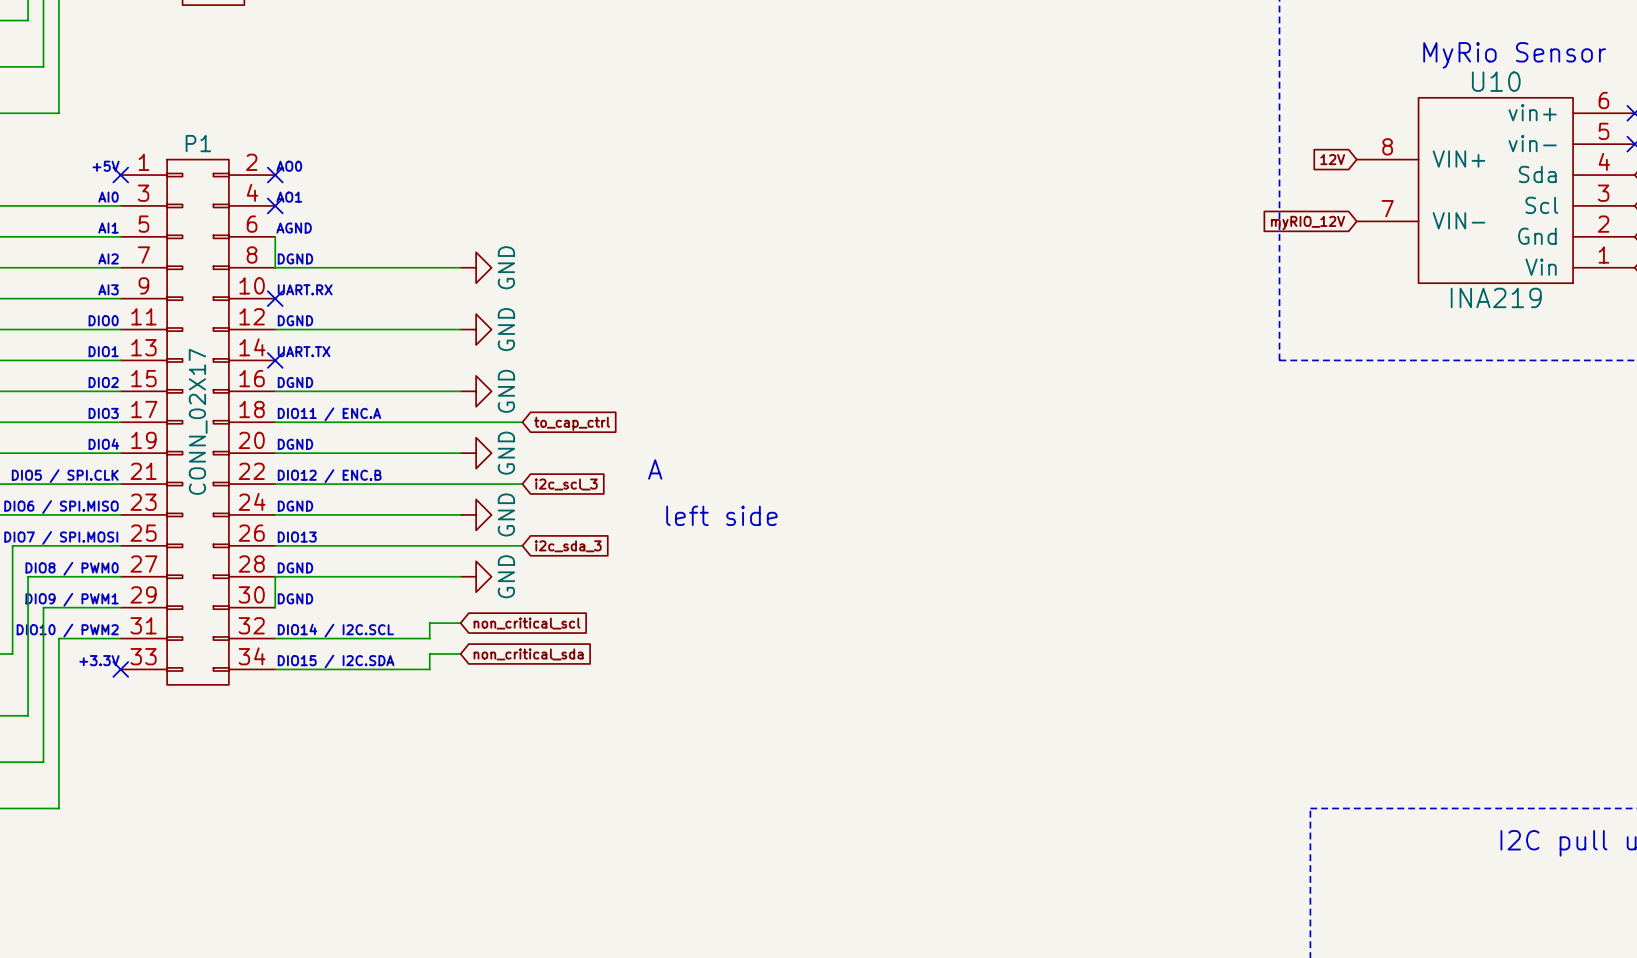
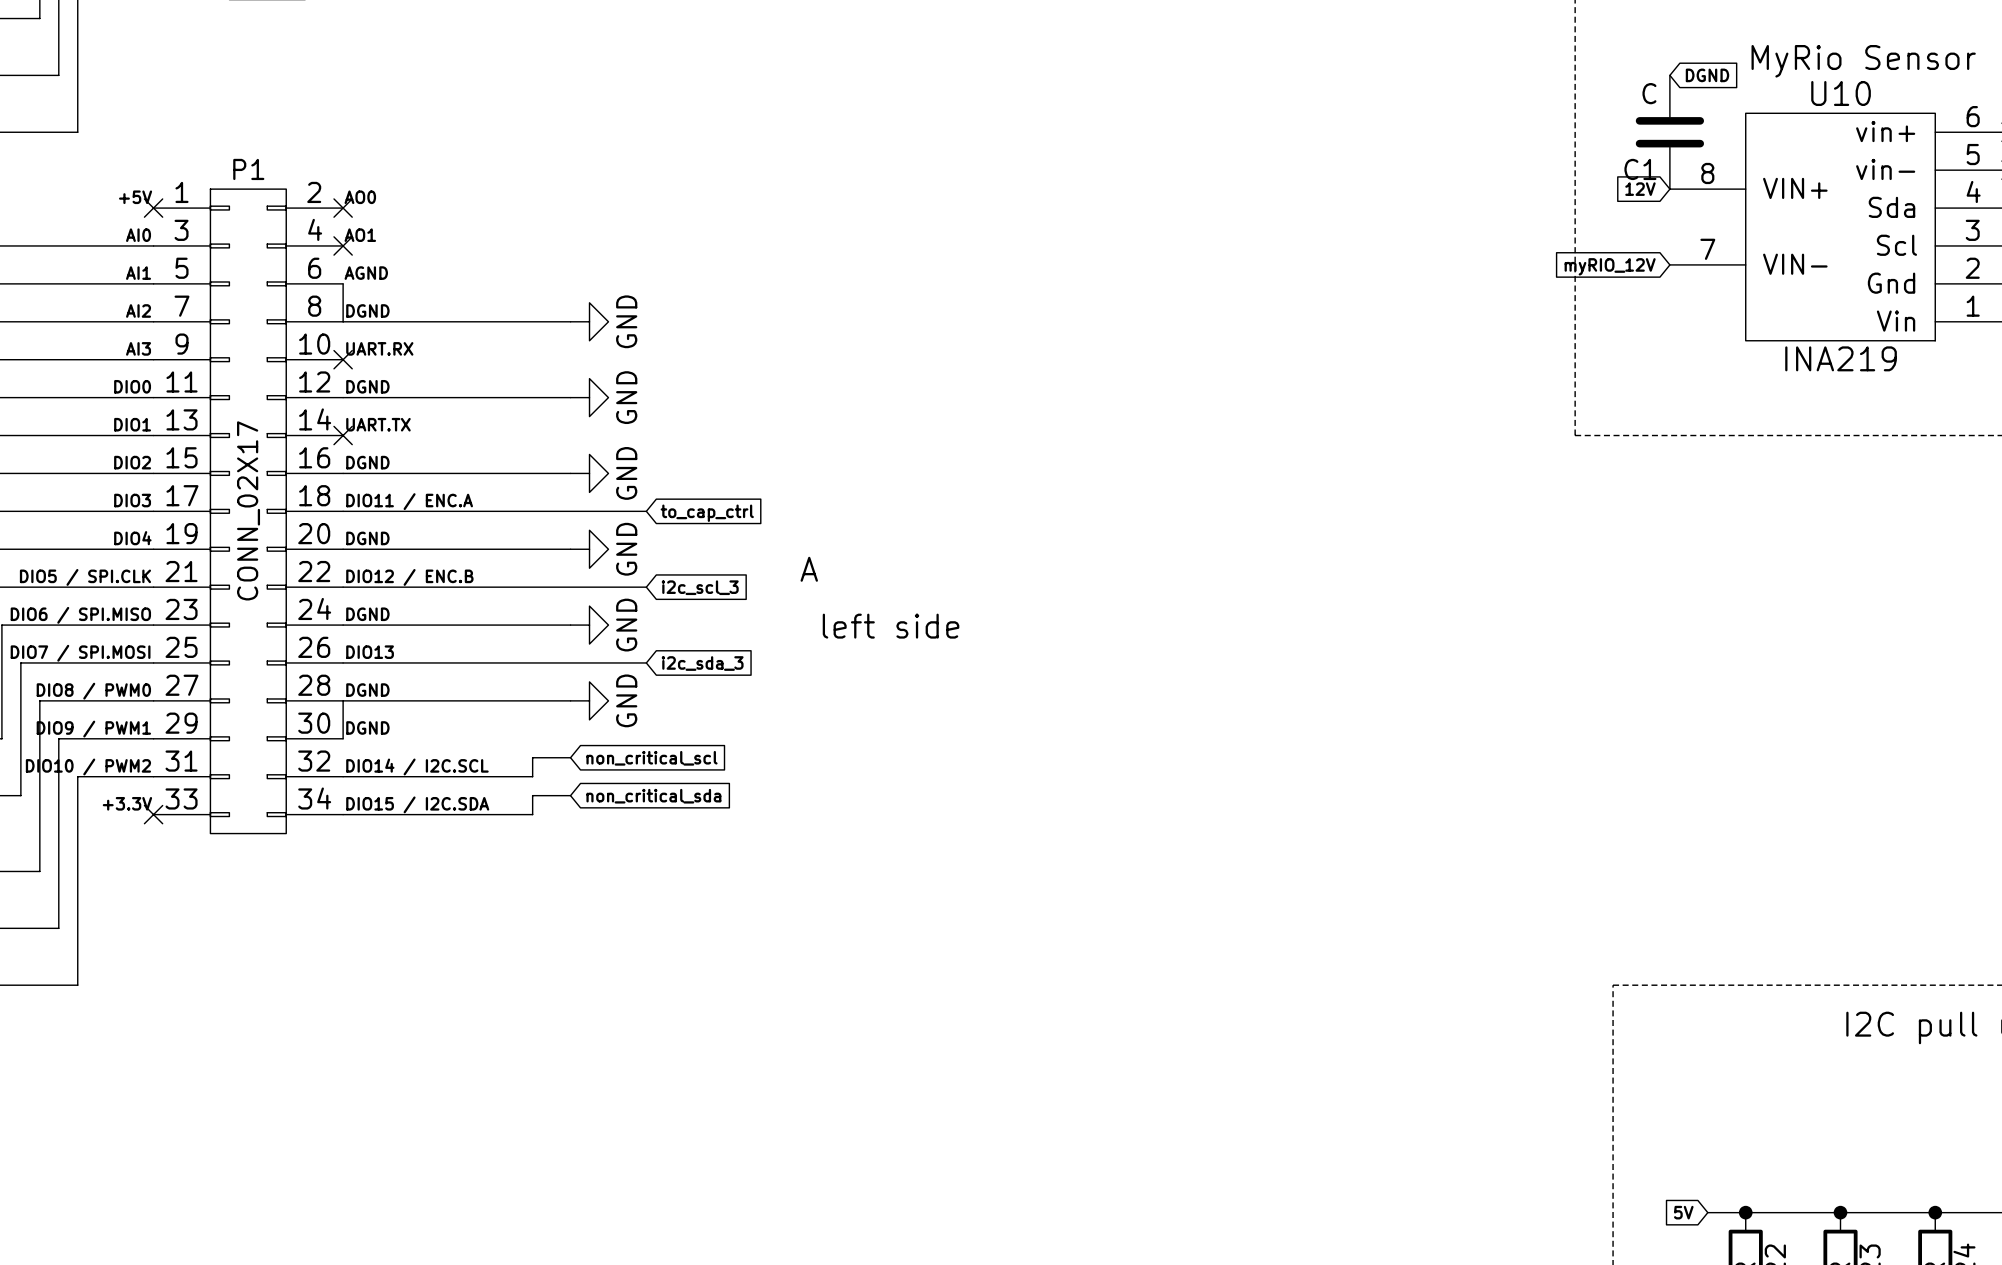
global label: none -> DGND (1707, 75)
C1: none -> C (1669, 132)

